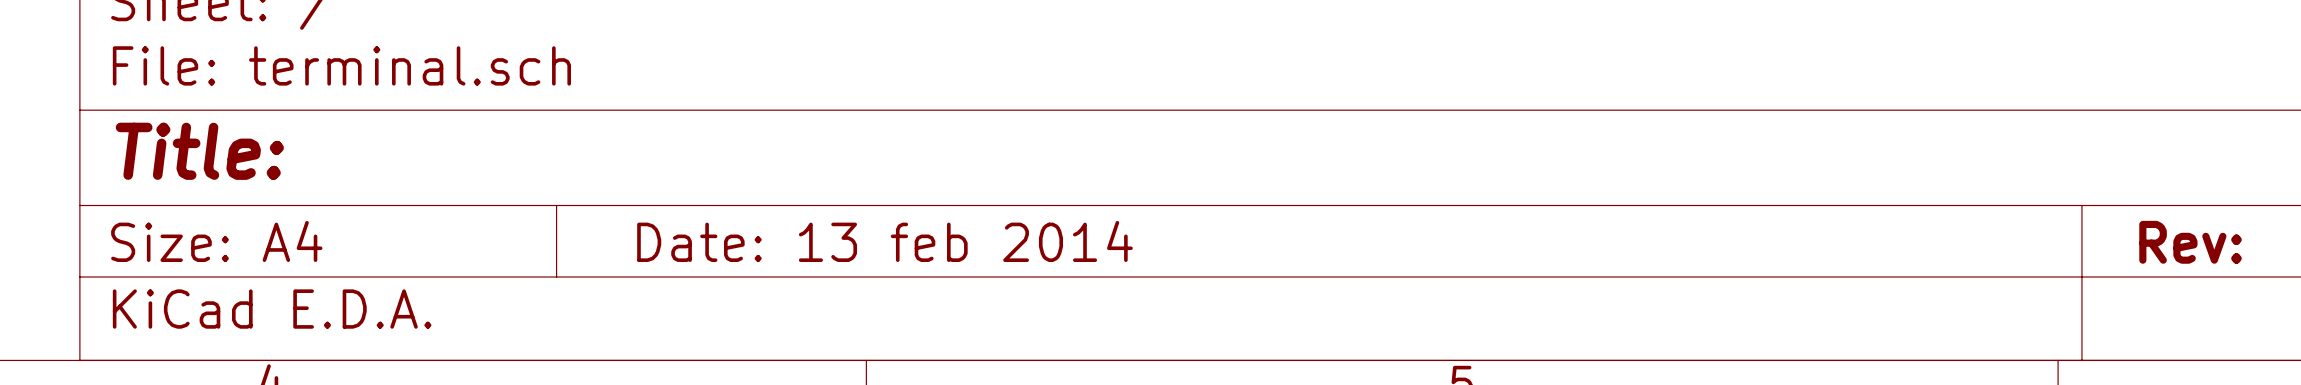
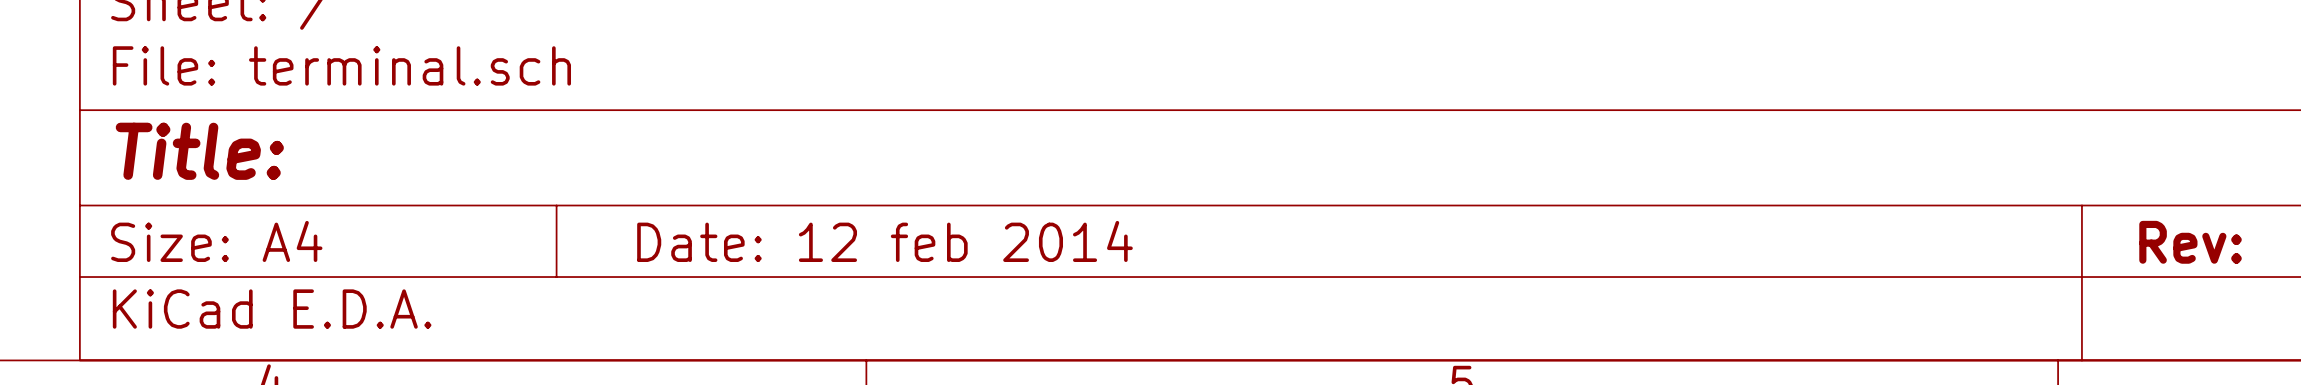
title block: Date: 13 feb 2014 (884, 241) -> Date: 12 feb 2014 (884, 241)

